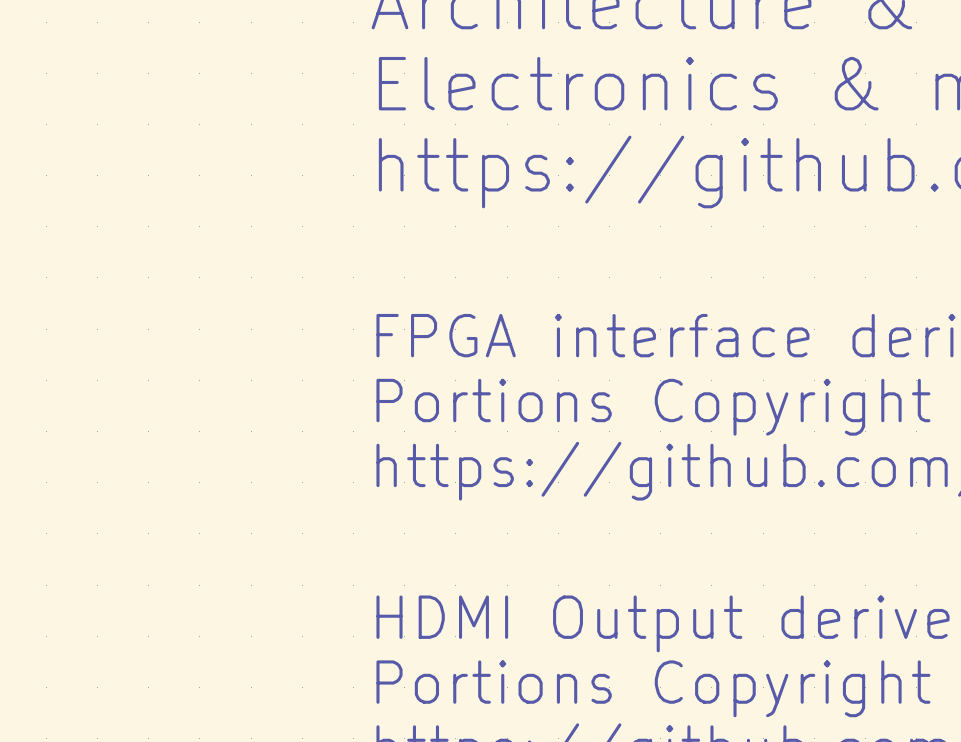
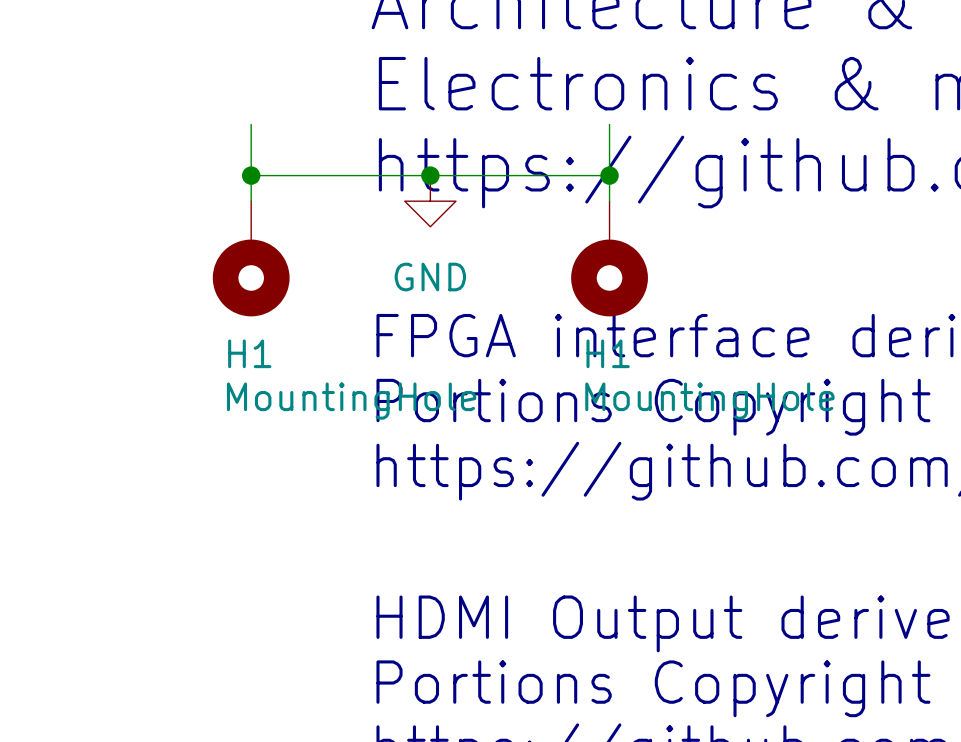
wire: none -> (251, 124) (251, 201)
wire: none -> (609, 124) (609, 201)
wire: none -> (251, 175) (609, 175)
junction: none -> (251, 175)
junction: none -> (430, 175)
junction: none -> (609, 175)
power symbol: none -> GND (430, 201)
H1: none -> MountingHole (251, 258)
H1: none -> MountingHole (609, 258)

